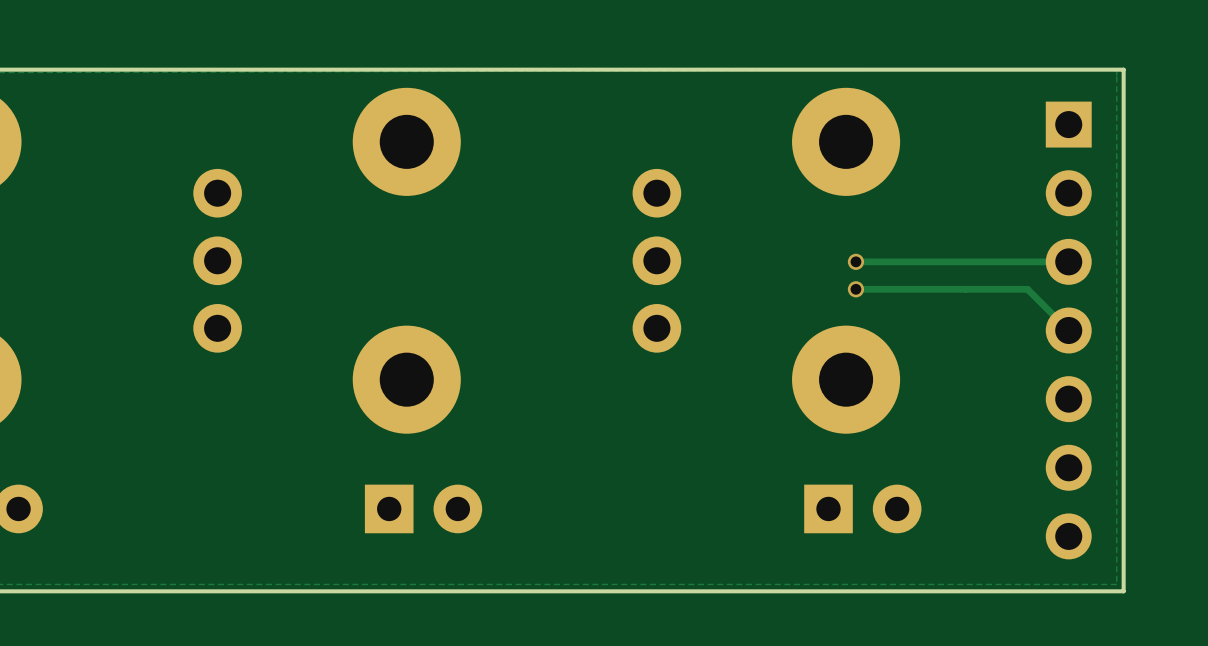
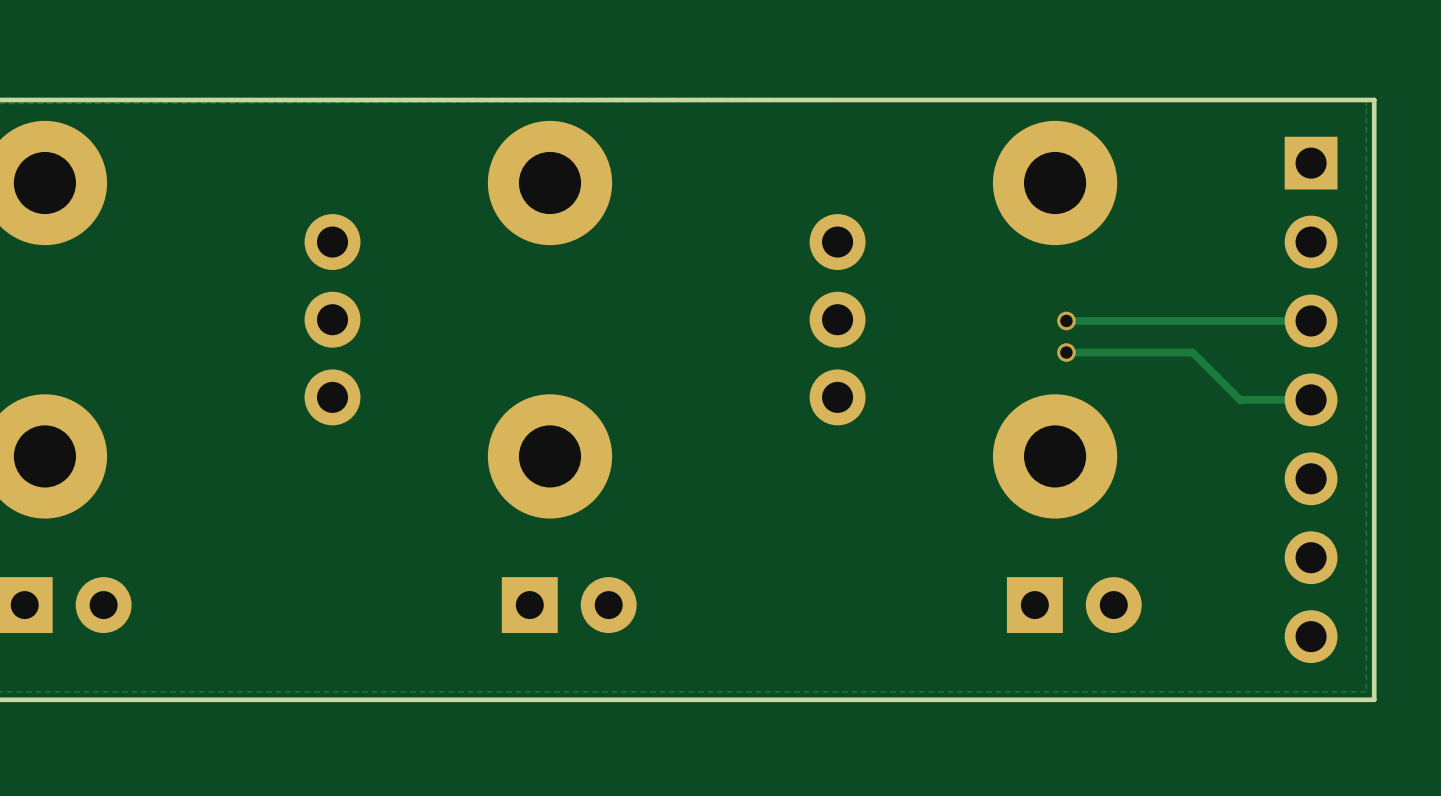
track: (965, 289) (1027, 289) (1068, 330) -> (1192, 352) (1240, 399) (1311, 399)

